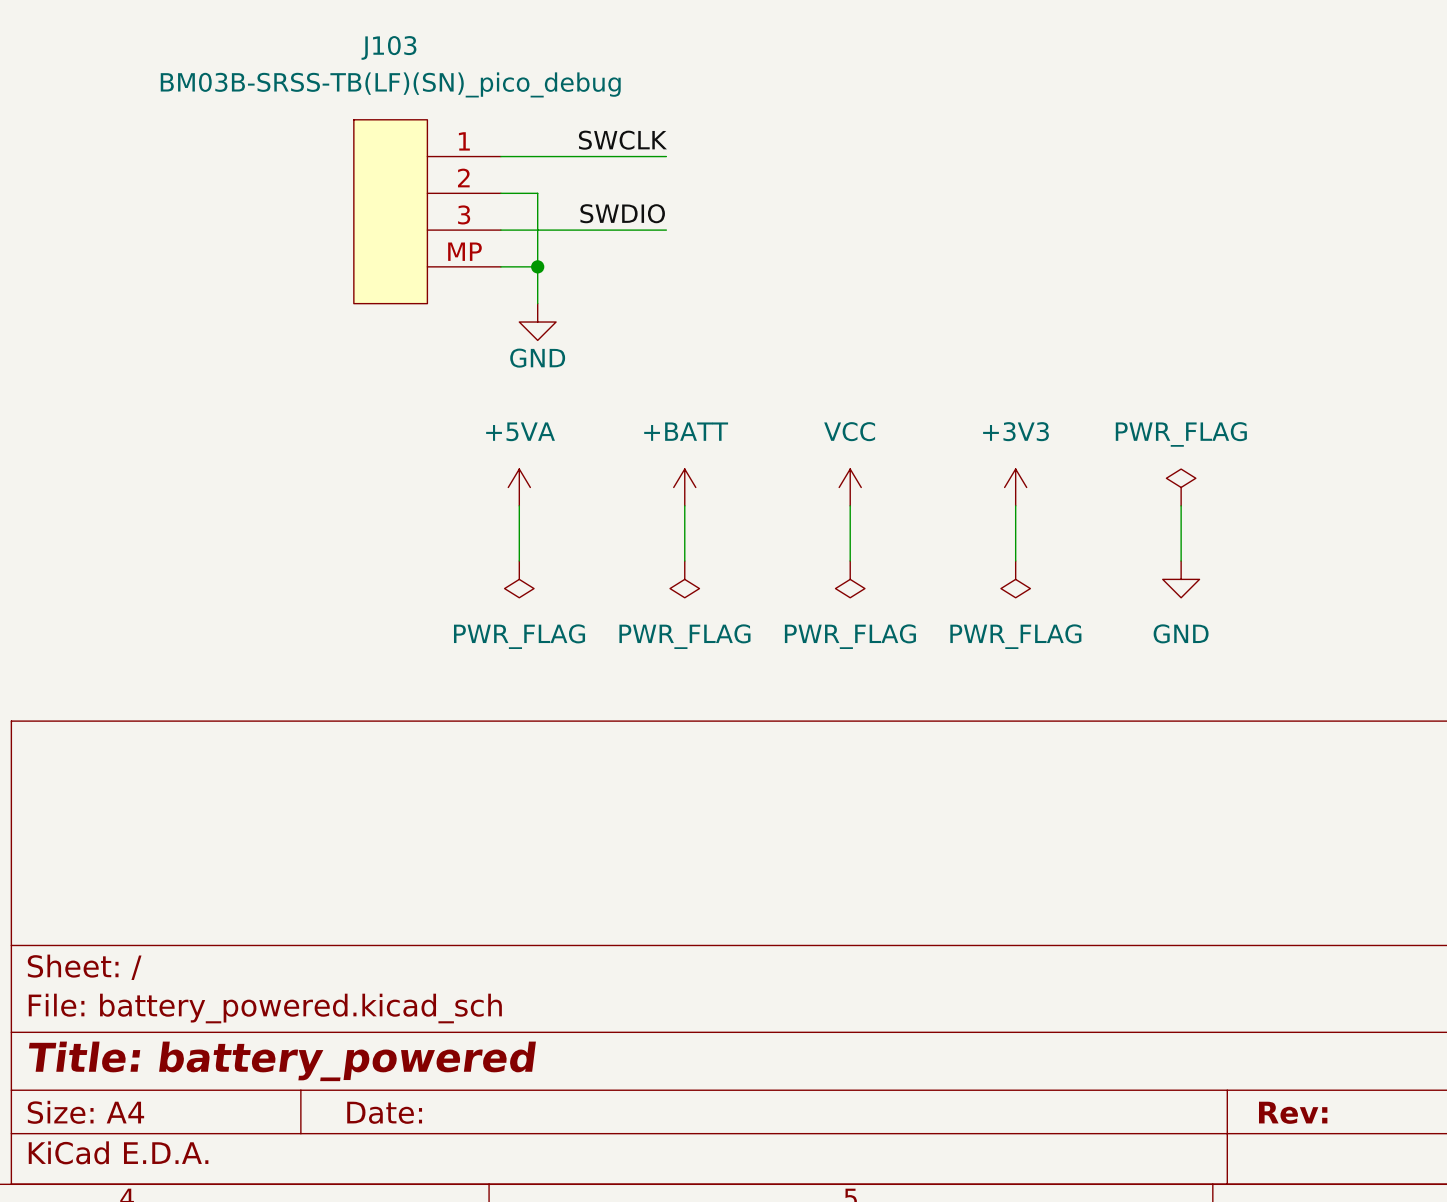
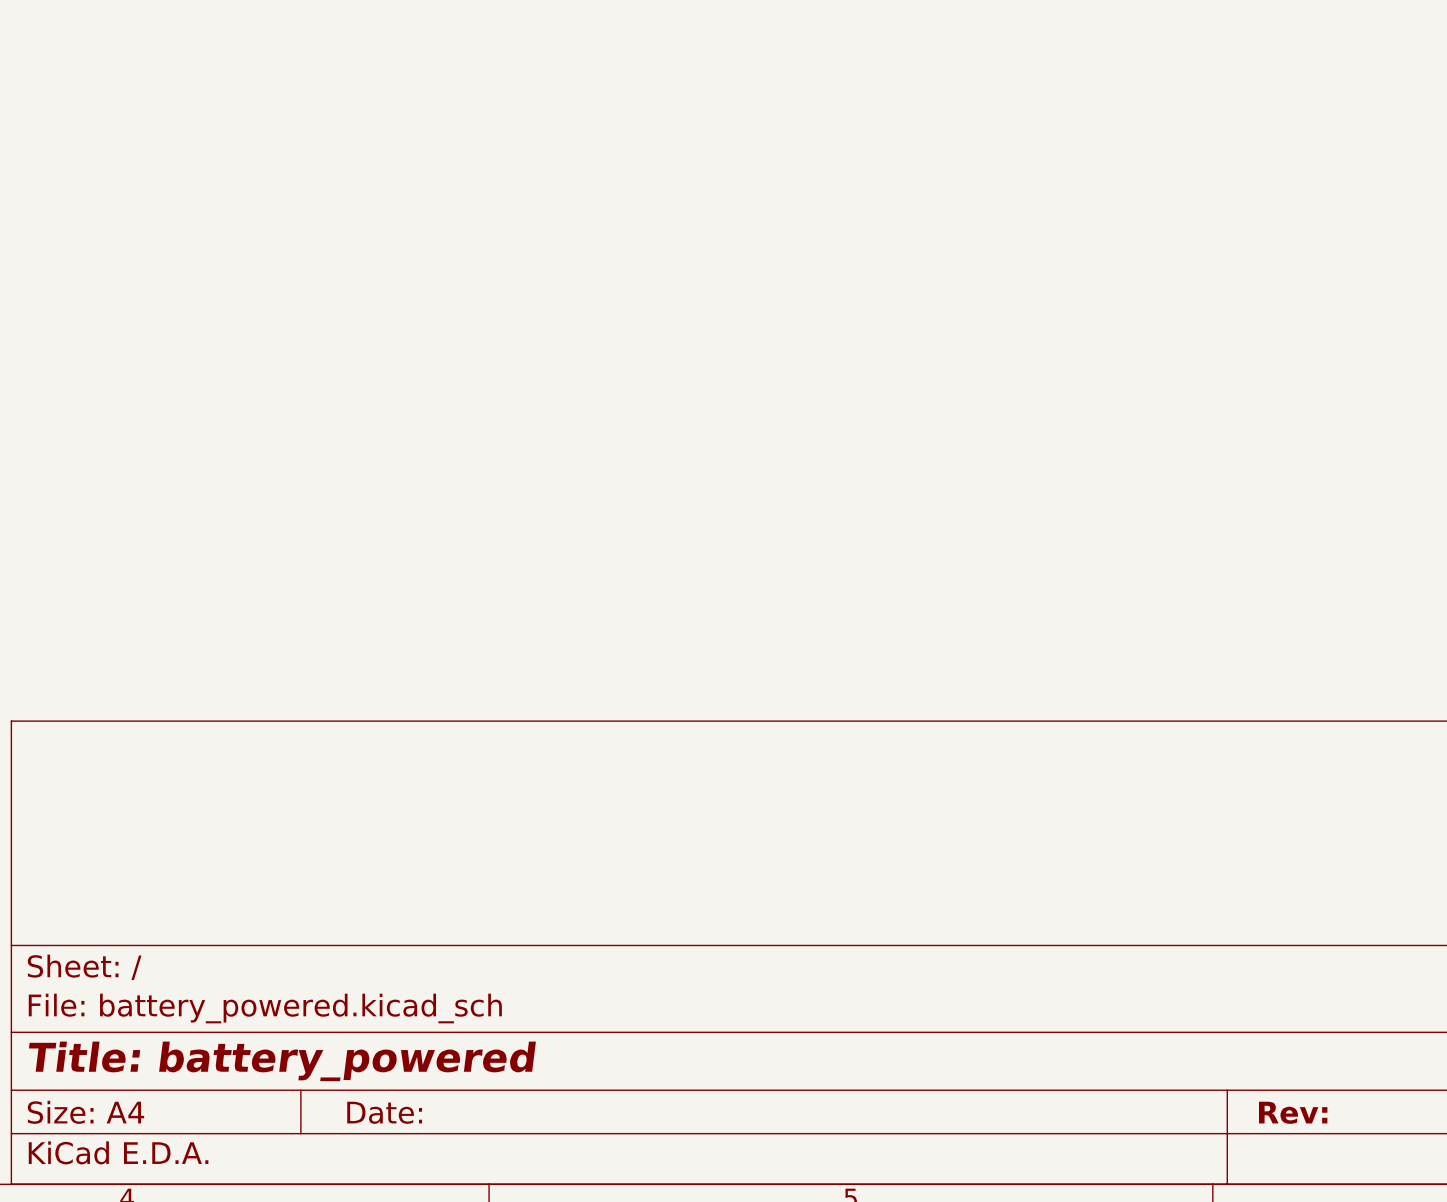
label: SWCLK (622, 140) -> none
wire: (500, 156) (666, 156) -> none
wire: (500, 193) (537, 193) (537, 303) -> none
J103: BM03B-SRSS-TB(LF)(SN)_pico_debug (427, 211) -> none
label: SWDIO (622, 213) -> none
wire: (500, 230) (666, 230) -> none
wire: (500, 266) (537, 266) -> none
junction: (537, 266) -> none
power symbol: GND (537, 322) -> none
power symbol: +5VA (519, 487) -> none
power symbol: +BATT (684, 487) -> none
power symbol: VCC (850, 487) -> none
power symbol: +3V3 (1015, 487) -> none
power symbol: PWR_FLAG (1181, 487) -> none
wire: (519, 505) (519, 561) -> none
wire: (684, 505) (684, 561) -> none
wire: (850, 505) (850, 561) -> none
wire: (1015, 505) (1015, 561) -> none
wire: (1181, 505) (1181, 561) -> none
power symbol: PWR_FLAG (519, 579) -> none
power symbol: PWR_FLAG (684, 579) -> none
power symbol: PWR_FLAG (850, 579) -> none
power symbol: PWR_FLAG (1015, 579) -> none
power symbol: GND (1181, 579) -> none

